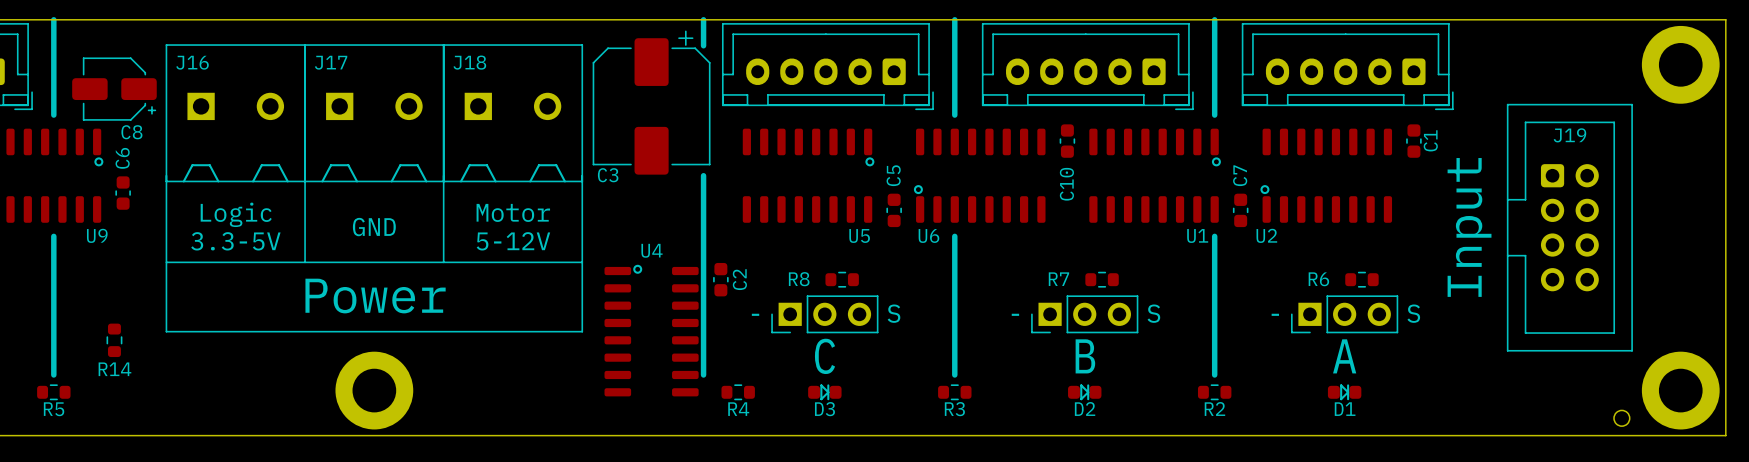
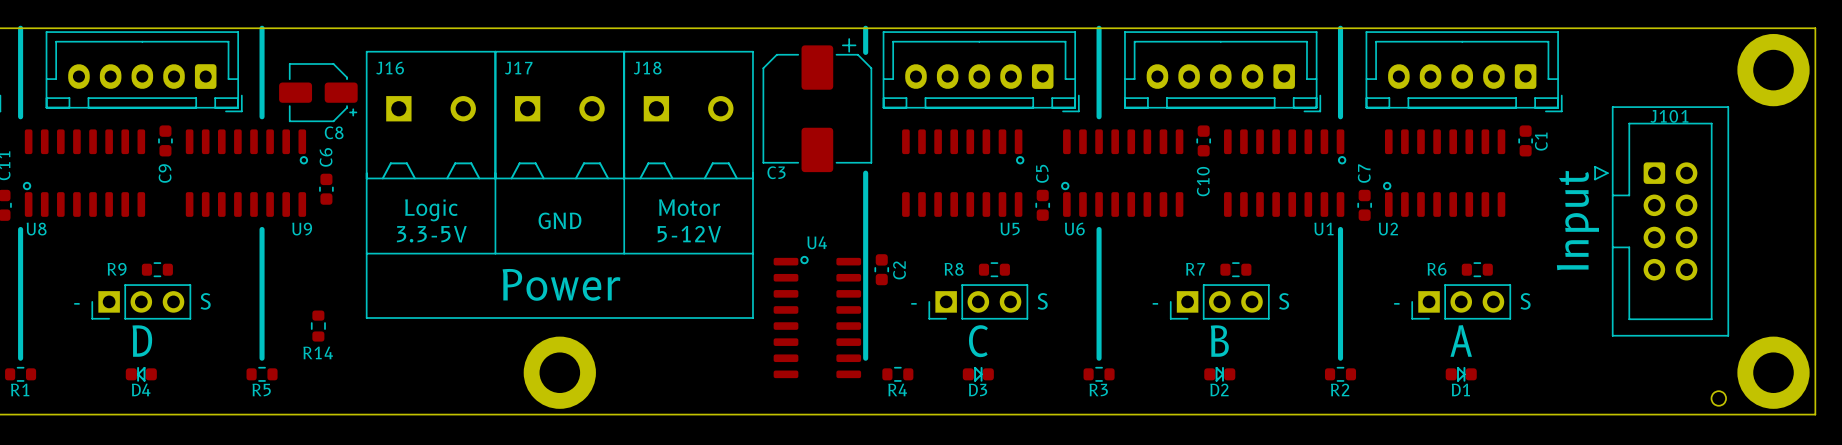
J101: none -> (1661, 221)
J19: (1569, 227) -> none

